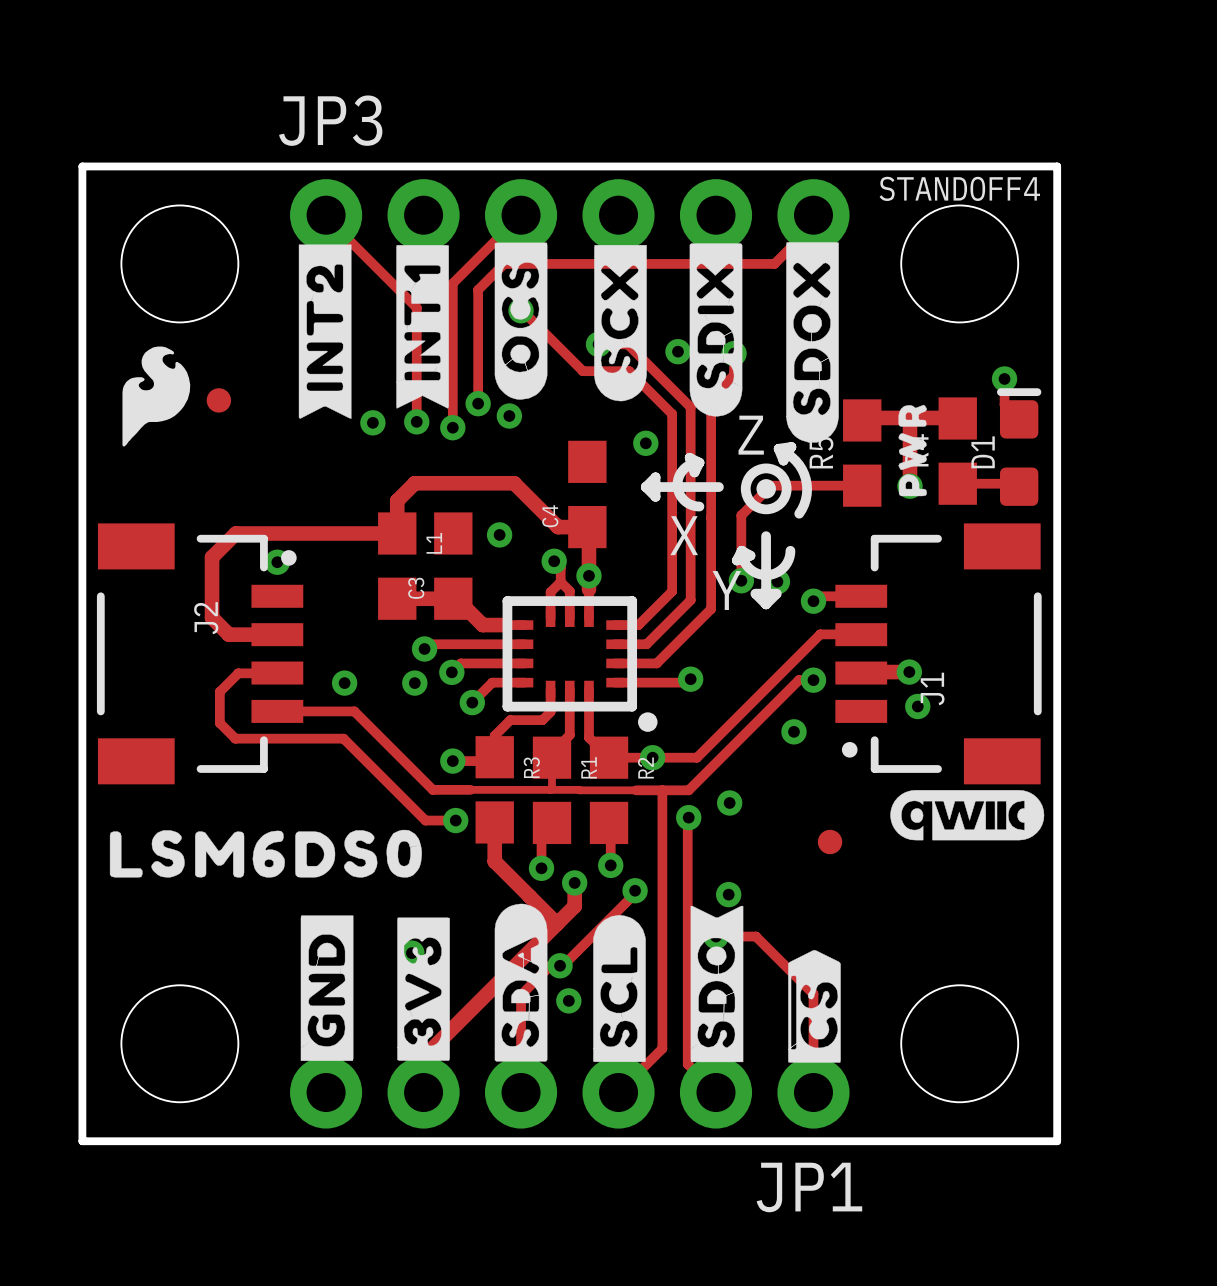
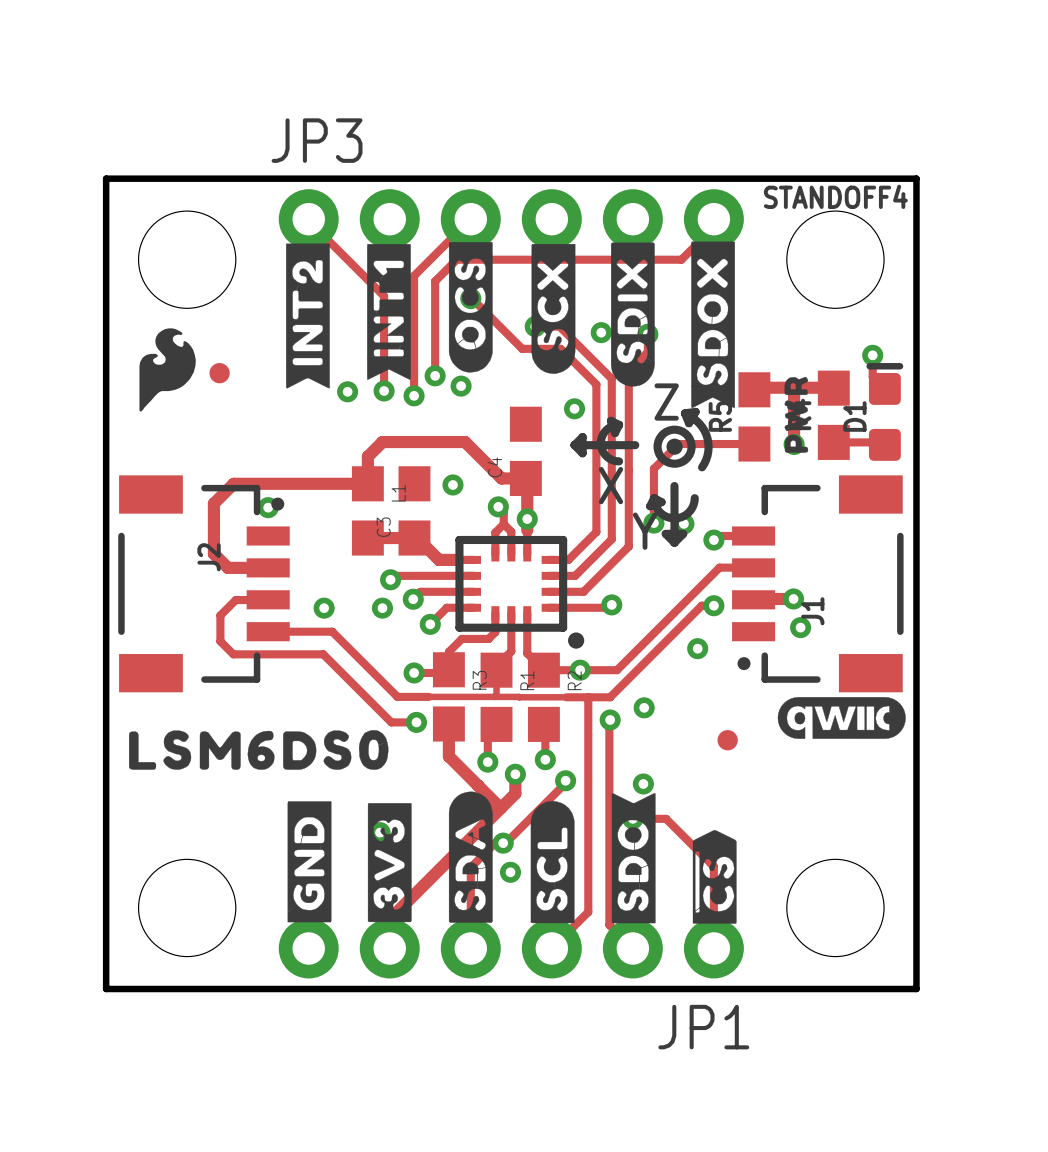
drawing shape: [786, 242, 839, 443] -> [691, 241, 735, 409]

